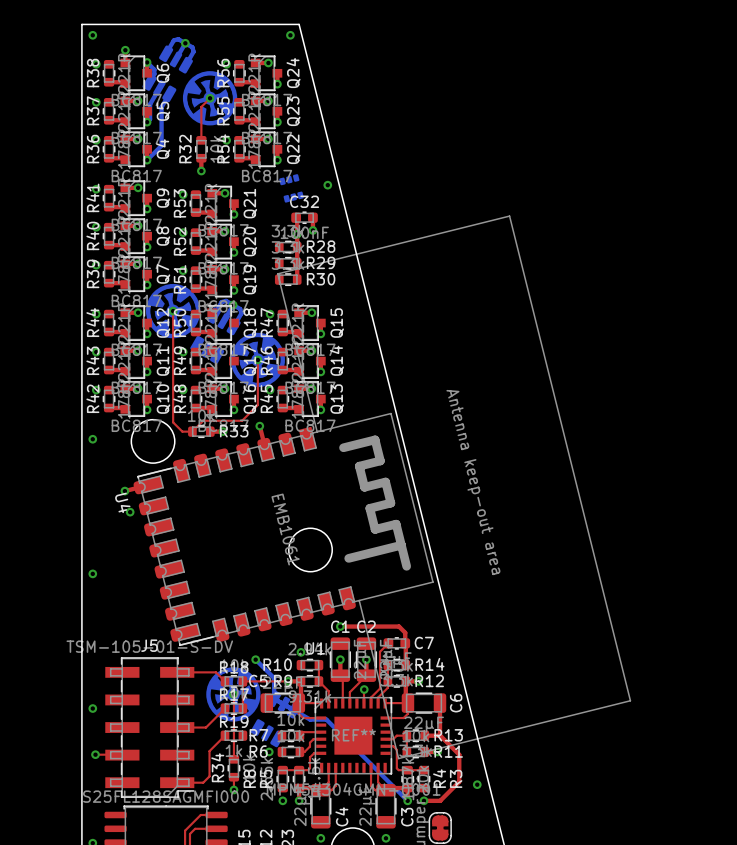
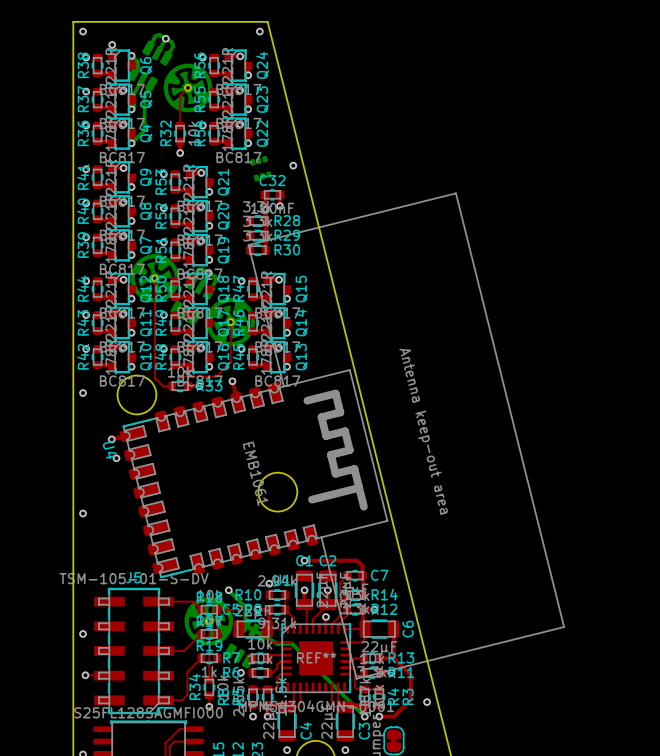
part footprint: [182, 71, 238, 126] -> [163, 63, 213, 113]
part footprint: [145, 283, 201, 339] -> [130, 254, 180, 303]
part footprint: [230, 332, 285, 388] -> [206, 297, 256, 347]
part footprint: [206, 667, 261, 722] -> [184, 597, 234, 646]

